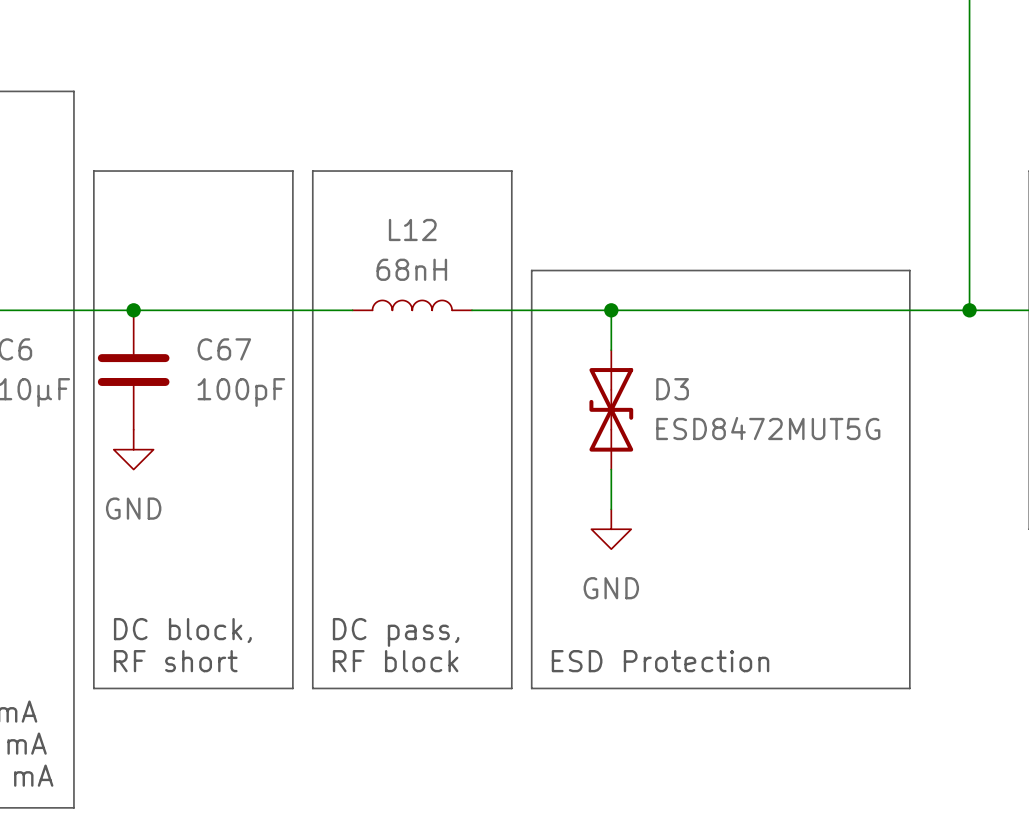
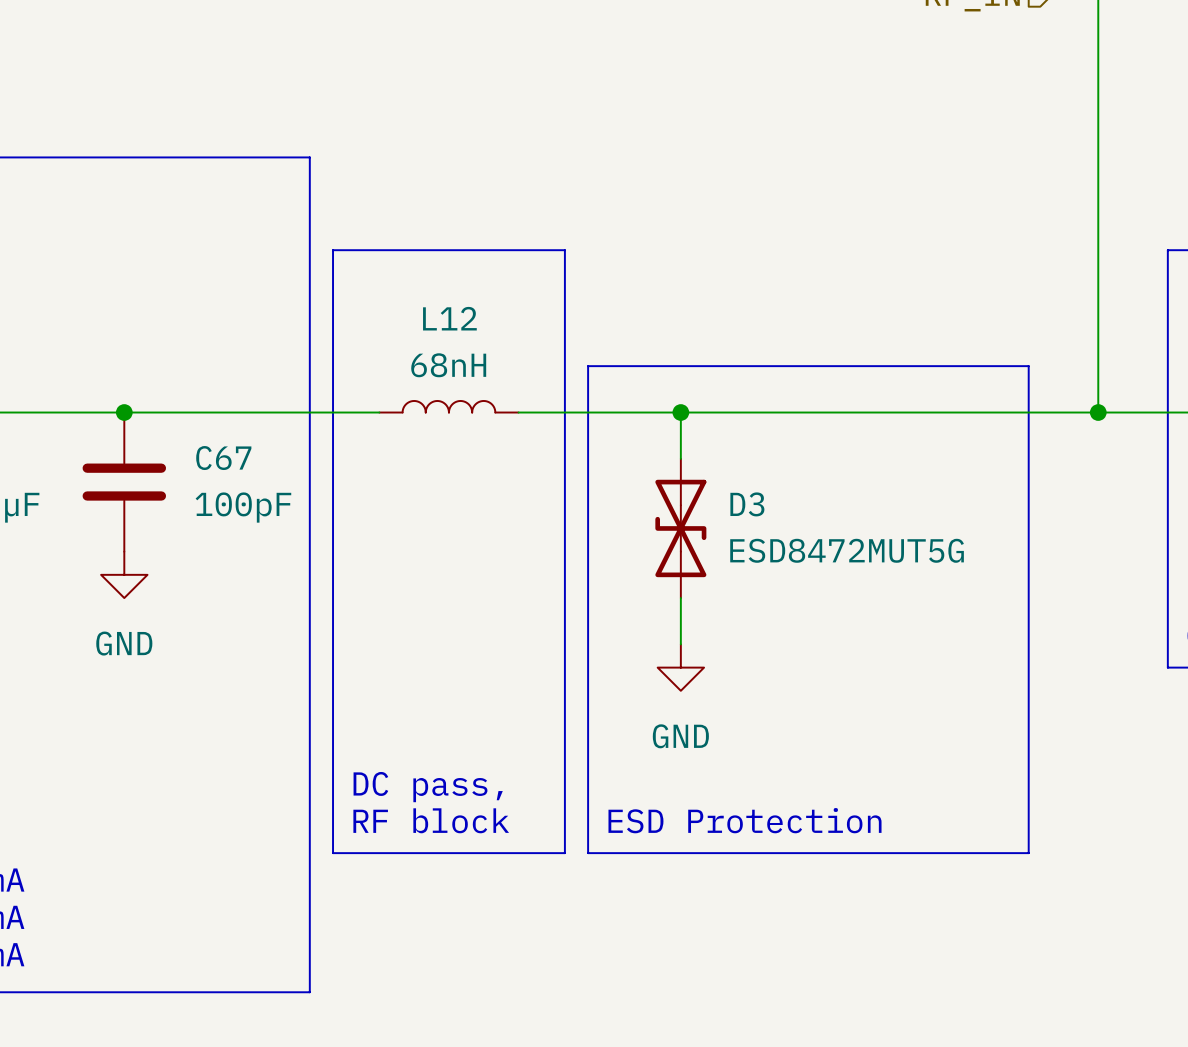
line: (73, 91) (73, 807) -> (309, 853) (309, 992) (54, 992)
line: (292, 171) (93, 171) (93, 688) (292, 688) -> (309, 250) (309, 157) (54, 157)
text: DC block, (182, 630) -> none
text: RF short (175, 661) -> none

